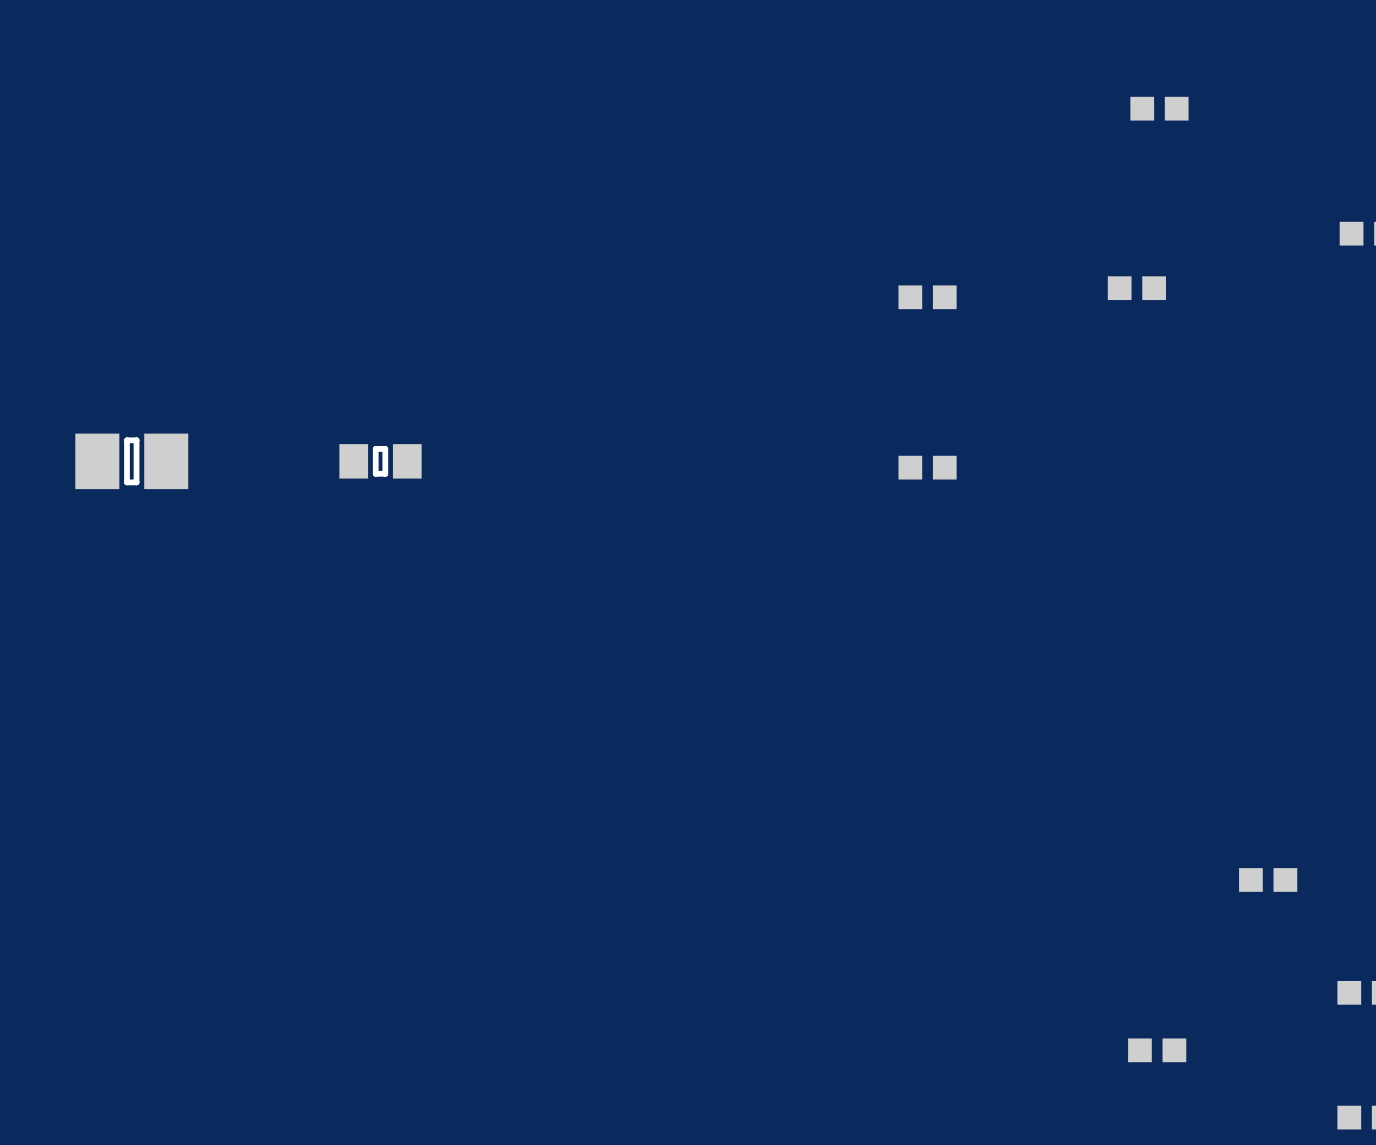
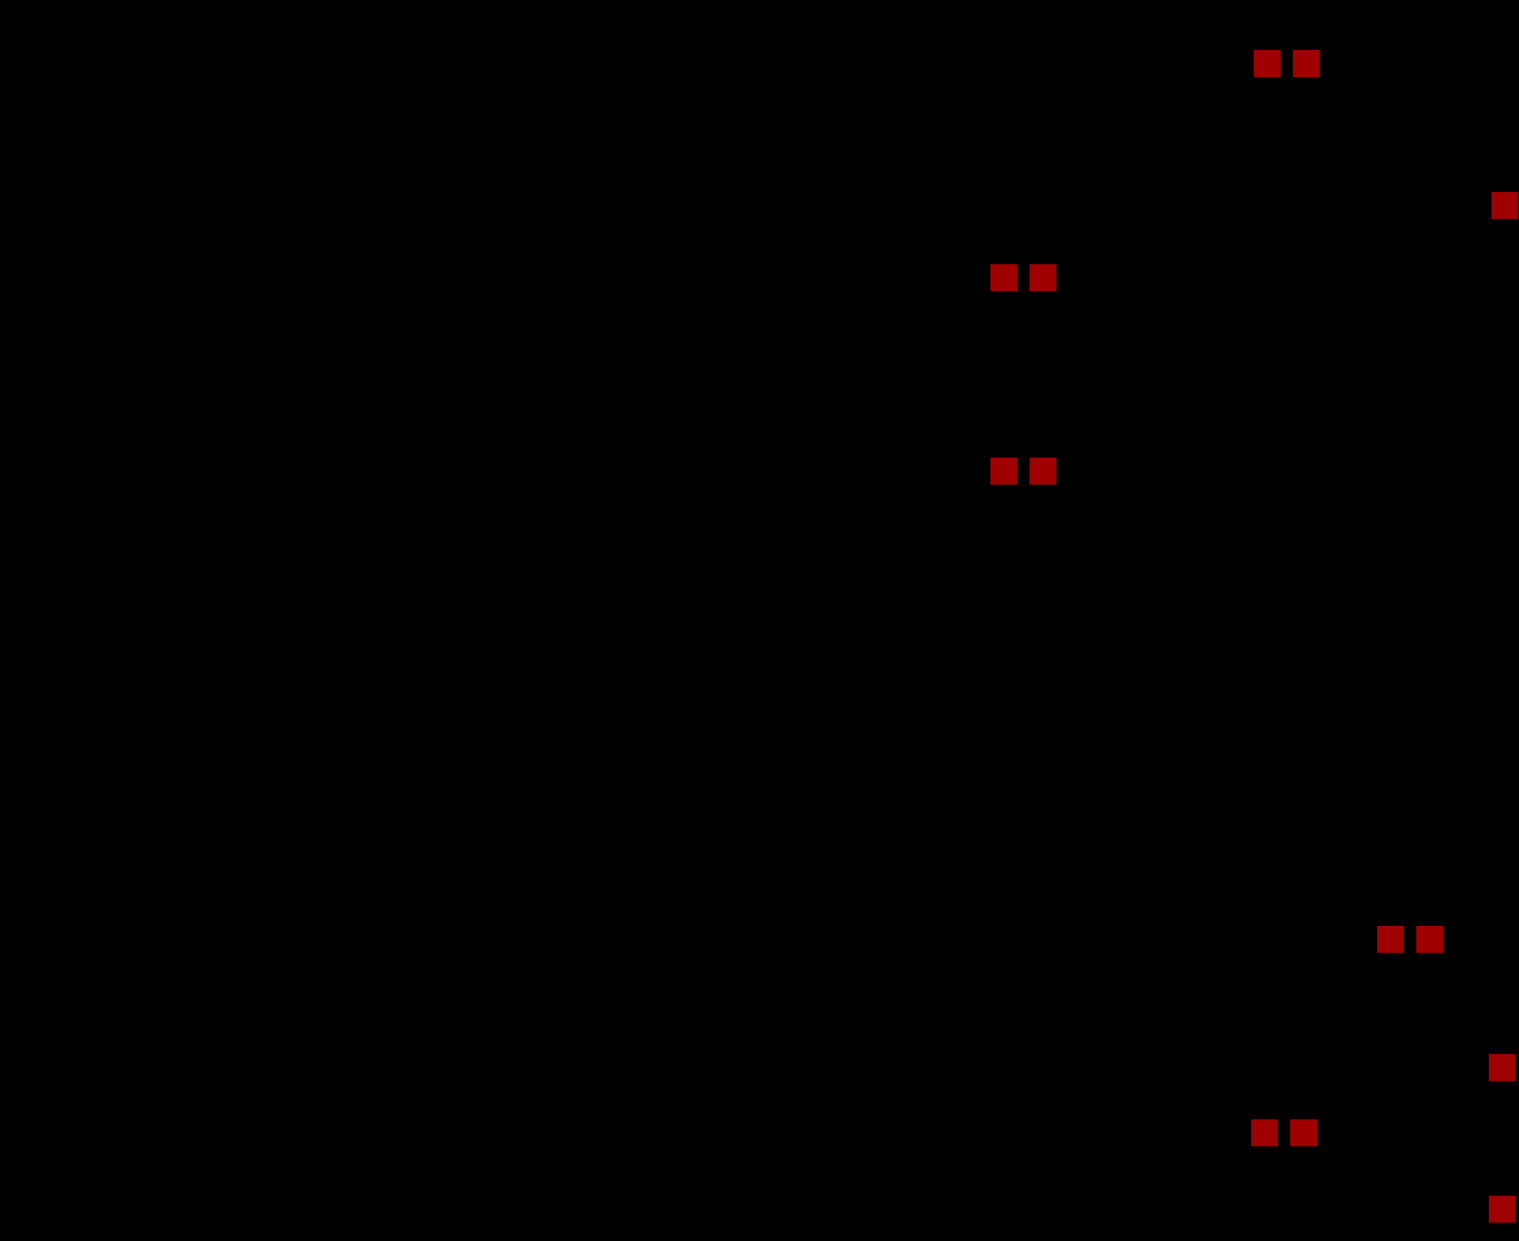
part: (1136, 288) -> none
part: (131, 461) -> none
part: (380, 461) -> none

